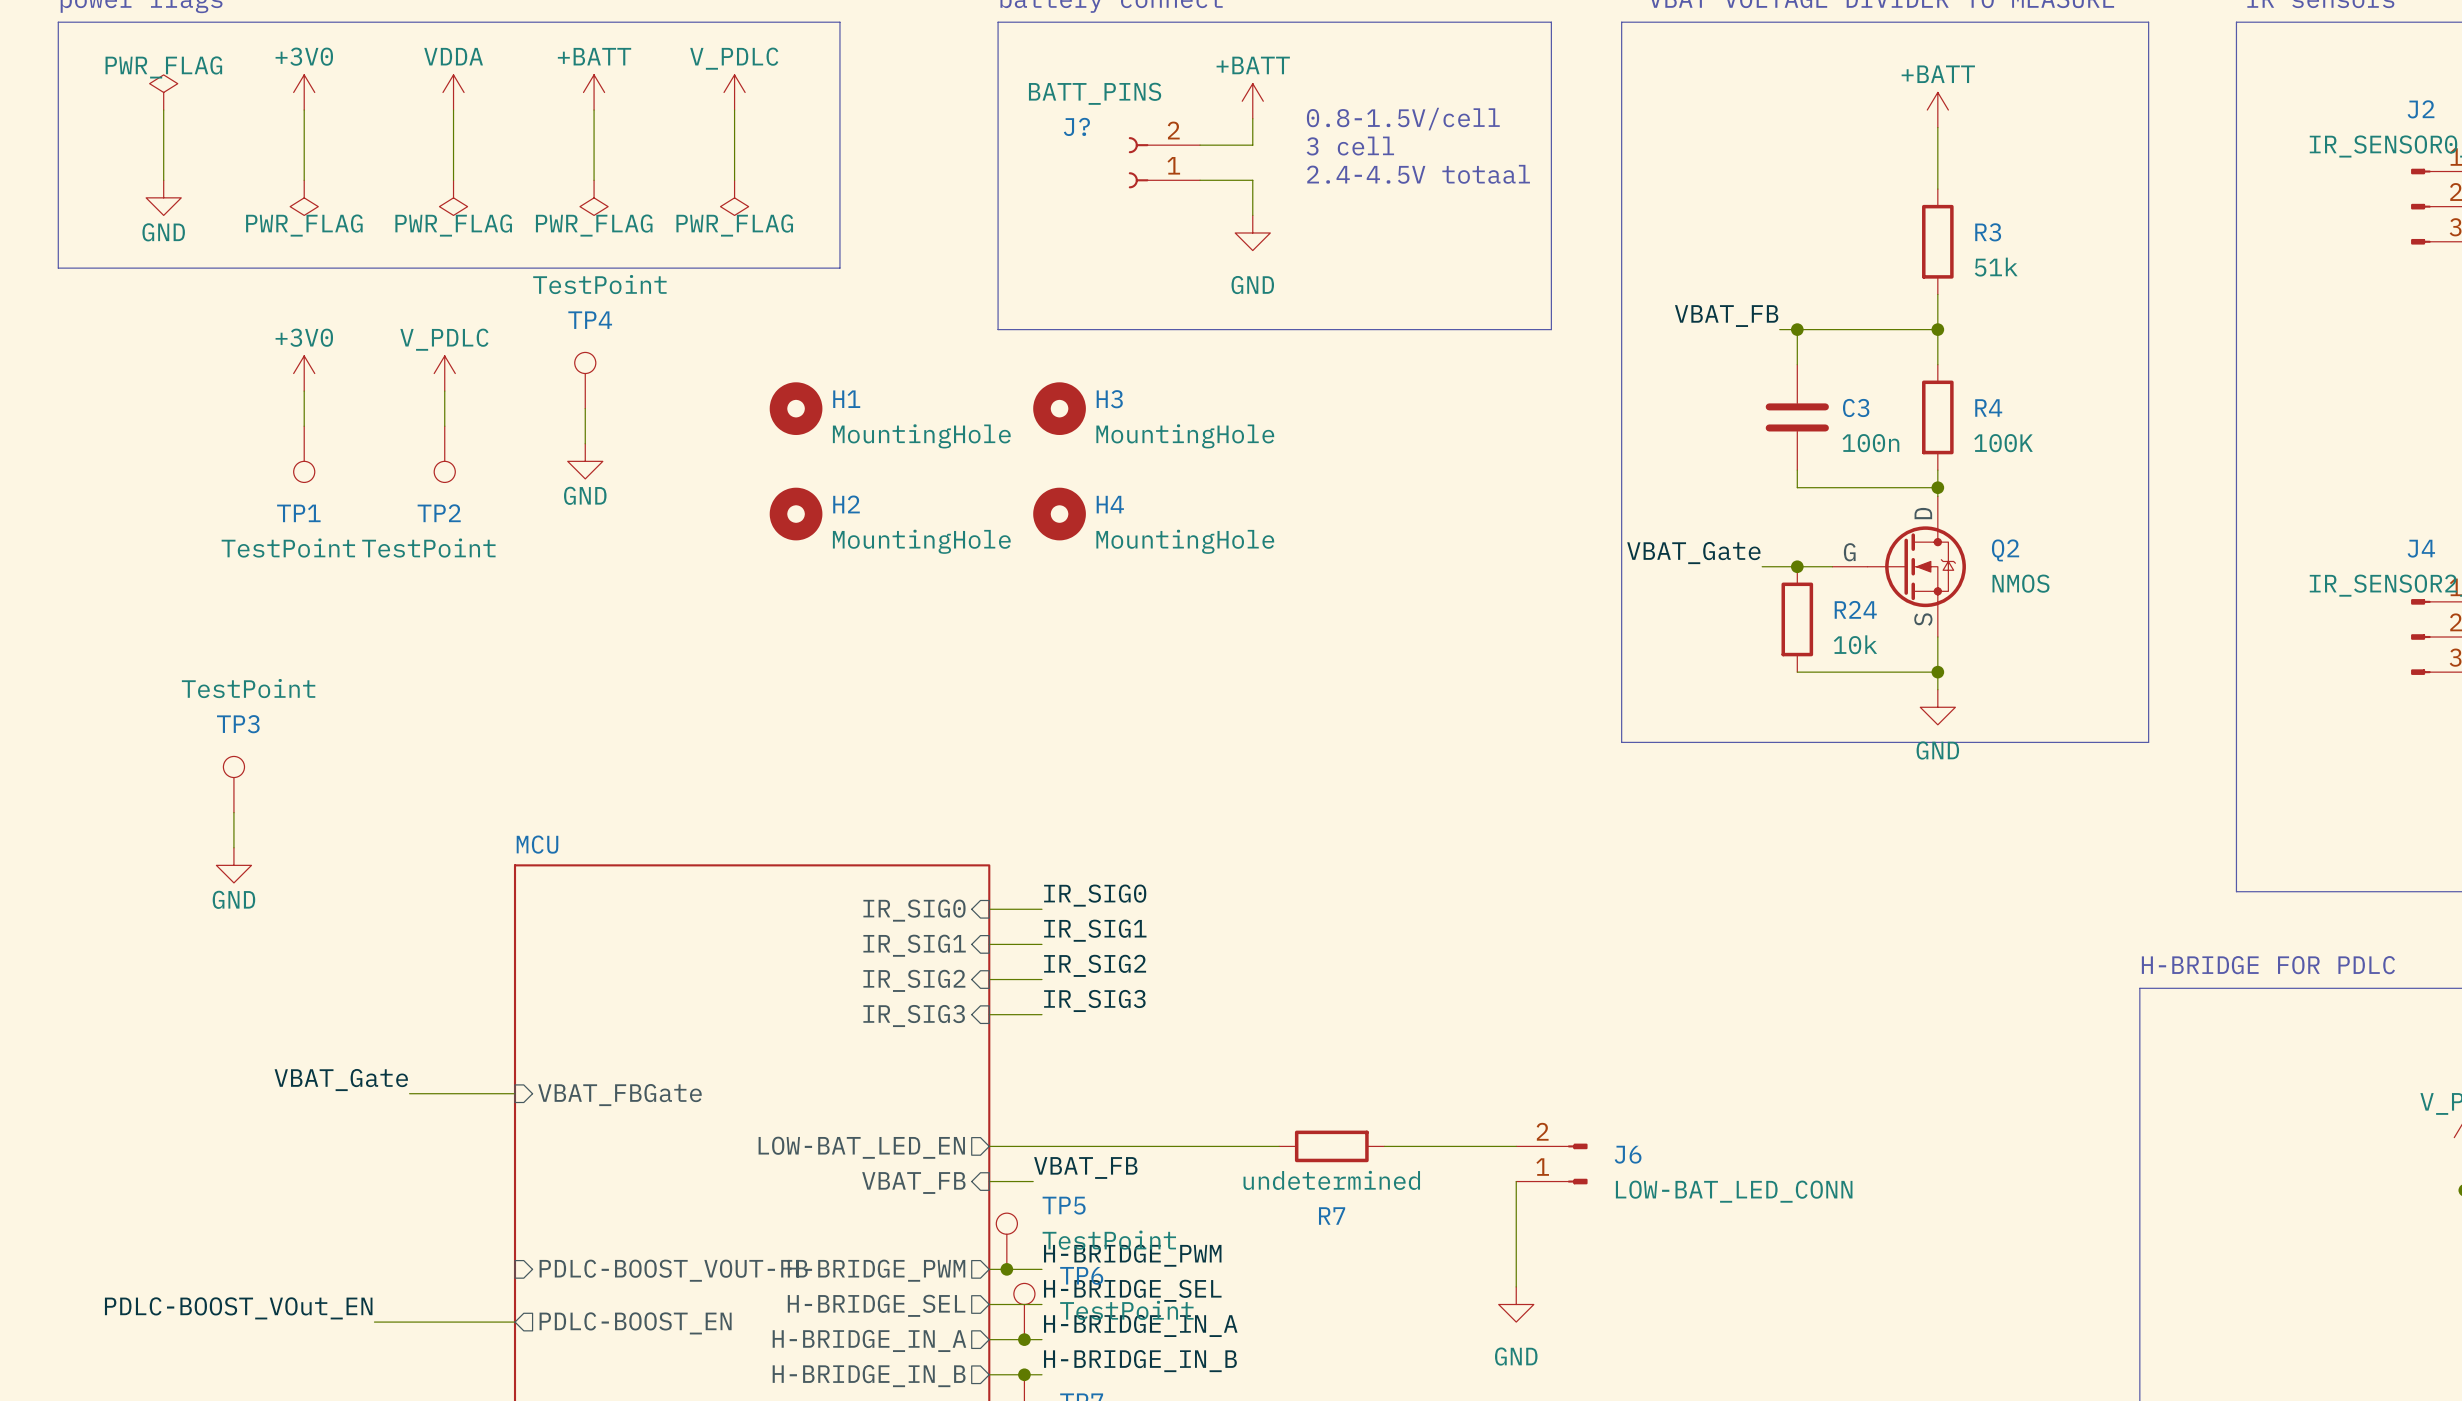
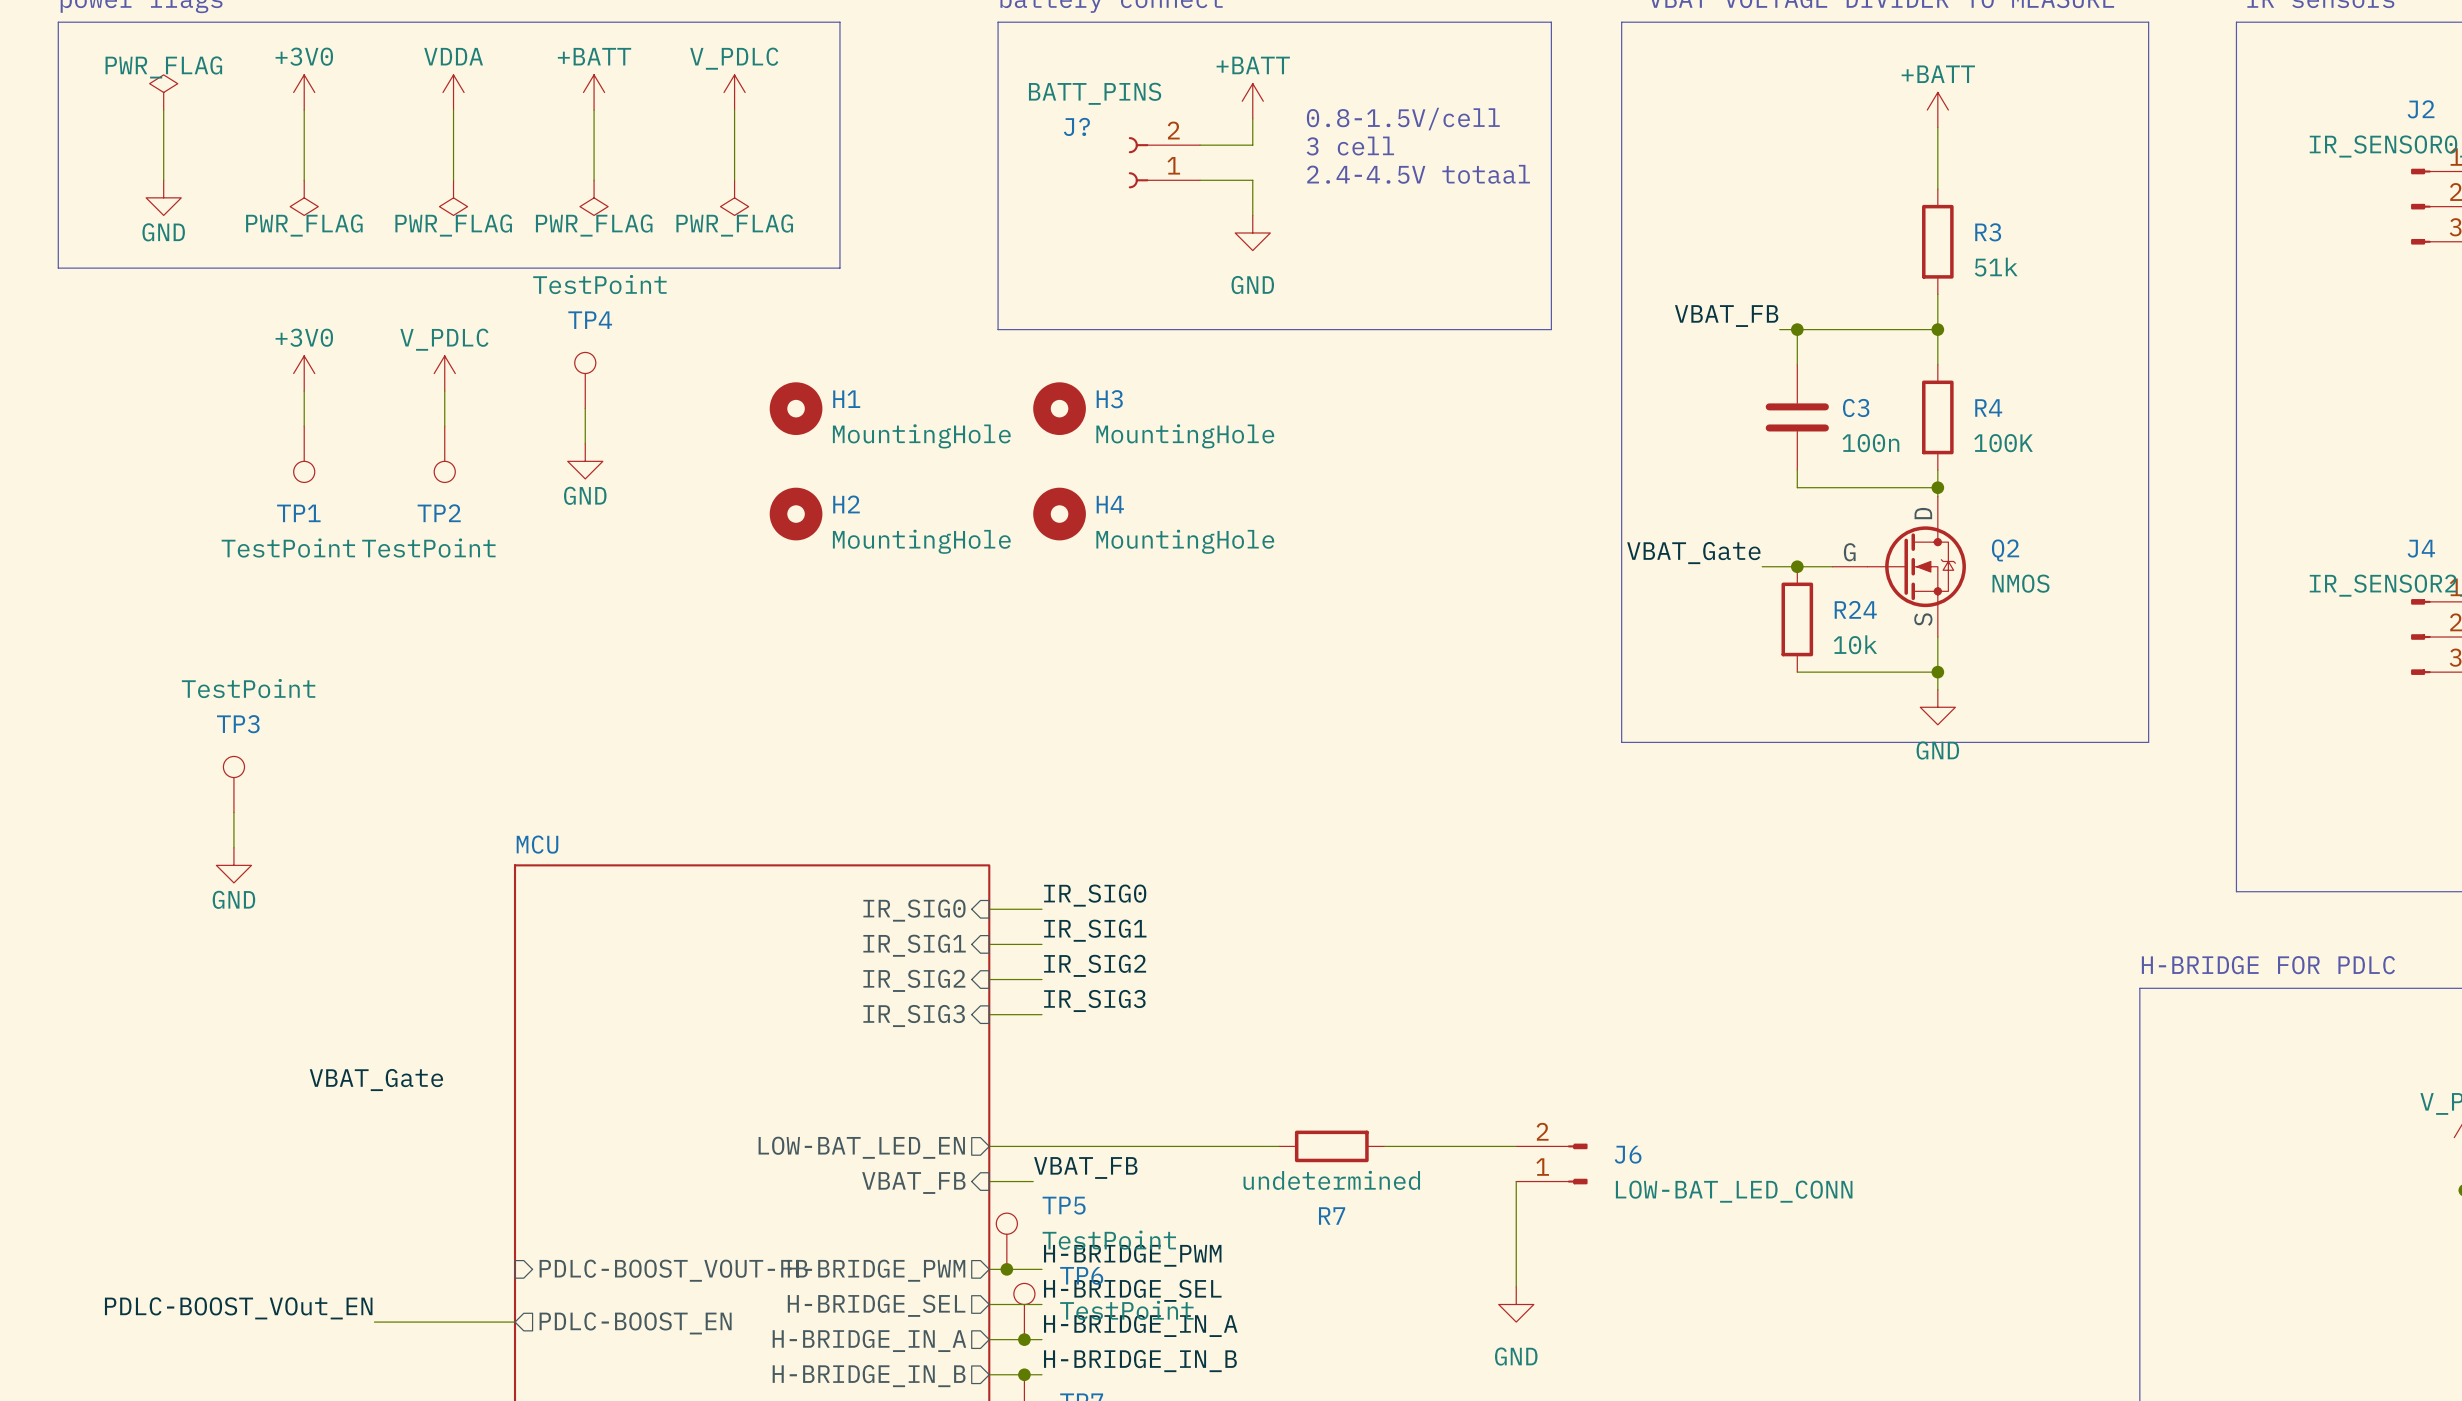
label position: VBAT_Gate (341, 1080) -> VBAT_Gate (376, 1080)
wire: (409, 1093) (515, 1093) -> none
sheet pin: VBAT_FBGate (619, 1095) -> none

